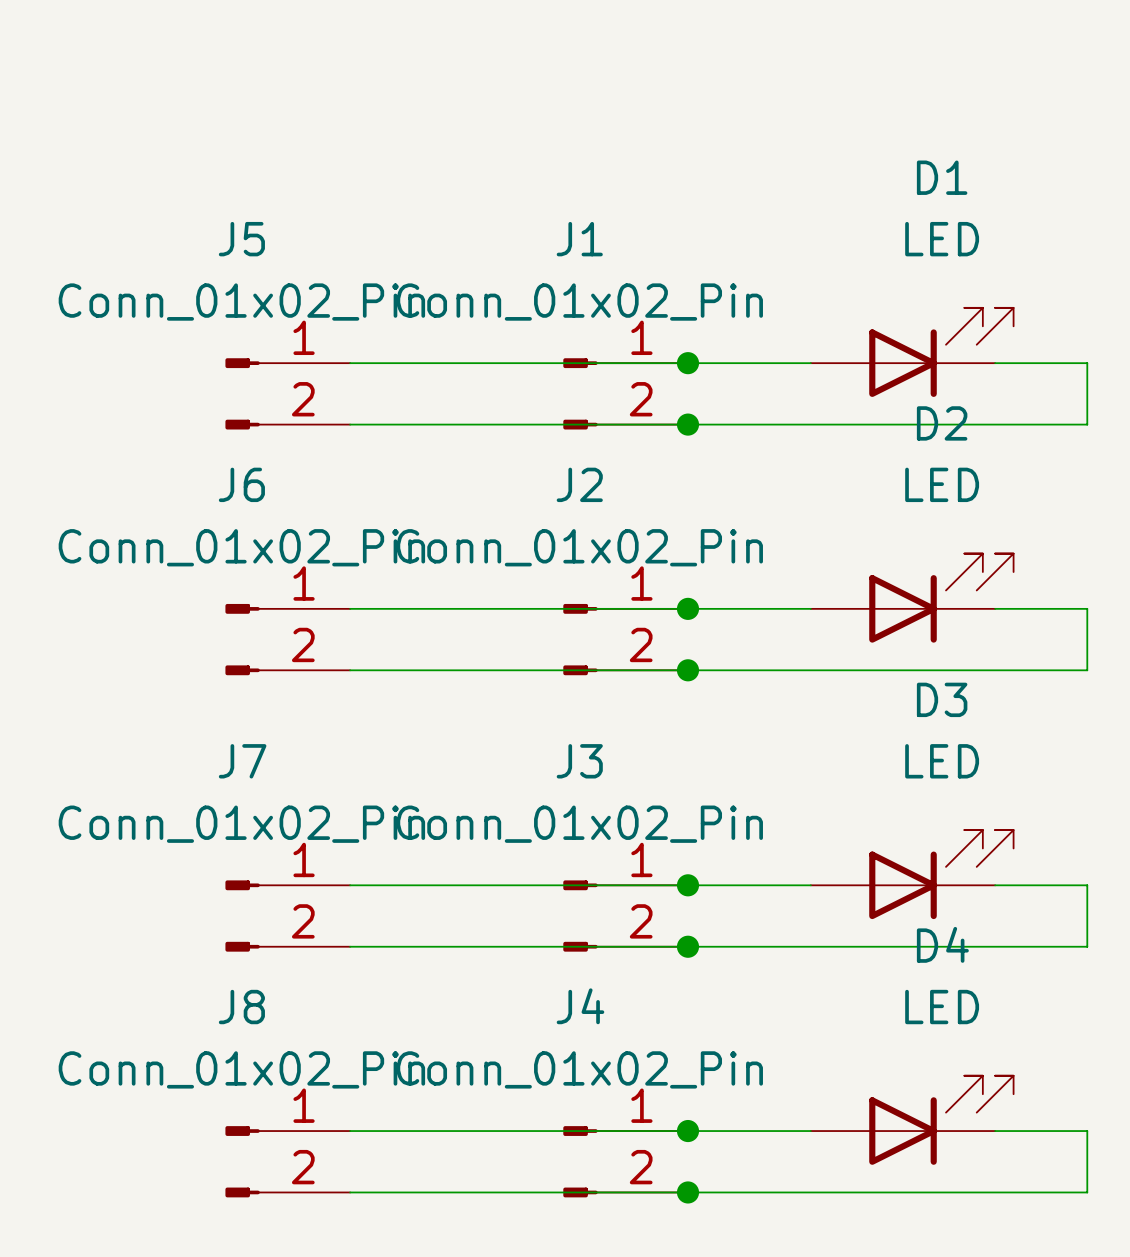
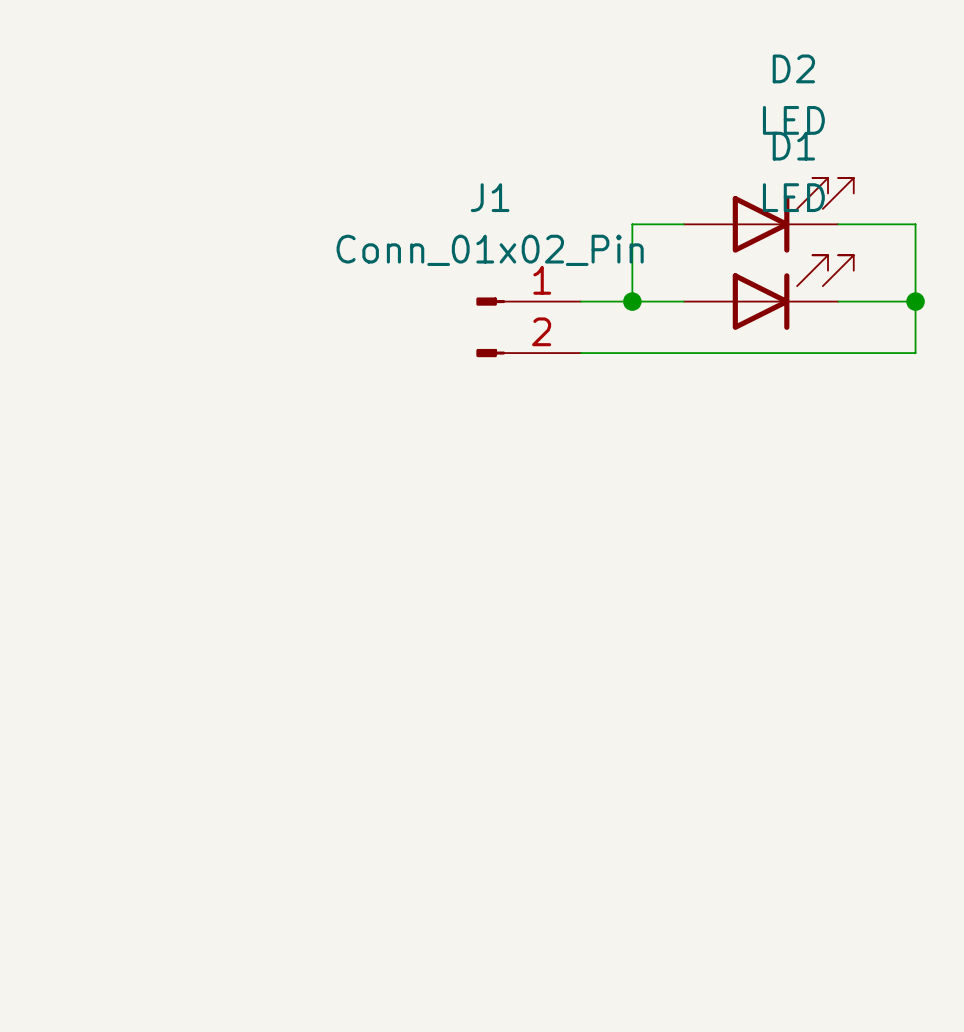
wire: none -> (683, 224) (632, 224) (632, 301)
wire: none -> (838, 224) (915, 224) (915, 301)
wire: (350, 363) (687, 363) -> none
junction: (687, 363) -> none
junction: none -> (632, 301)
junction: none -> (915, 301)
J5: Conn_01x02_Pin (287, 393) -> none
wire: (350, 424) (687, 424) -> none
junction: (687, 424) -> none
D2 position: (912, 598) -> (768, 215)
wire: (350, 608) (810, 608) -> none
junction: (687, 608) -> none
wire: (995, 608) (1087, 608) (1087, 670) (350, 670) -> none
J6: Conn_01x02_Pin (287, 639) -> none
J2: Conn_01x02_Pin (625, 639) -> none
junction: (687, 670) -> none
D3: LED (912, 874) -> none
wire: (350, 885) (810, 885) -> none
junction: (687, 885) -> none
wire: (995, 885) (1087, 885) (1087, 946) (350, 946) -> none
J7: Conn_01x02_Pin (287, 916) -> none
J3: Conn_01x02_Pin (625, 916) -> none
junction: (687, 946) -> none
D4: LED (912, 1120) -> none
wire: (350, 1131) (810, 1131) -> none
junction: (687, 1131) -> none
wire: (995, 1131) (1087, 1131) (1087, 1192) (350, 1192) -> none
J8: Conn_01x02_Pin (287, 1161) -> none
J4: Conn_01x02_Pin (625, 1161) -> none
junction: (687, 1192) -> none

